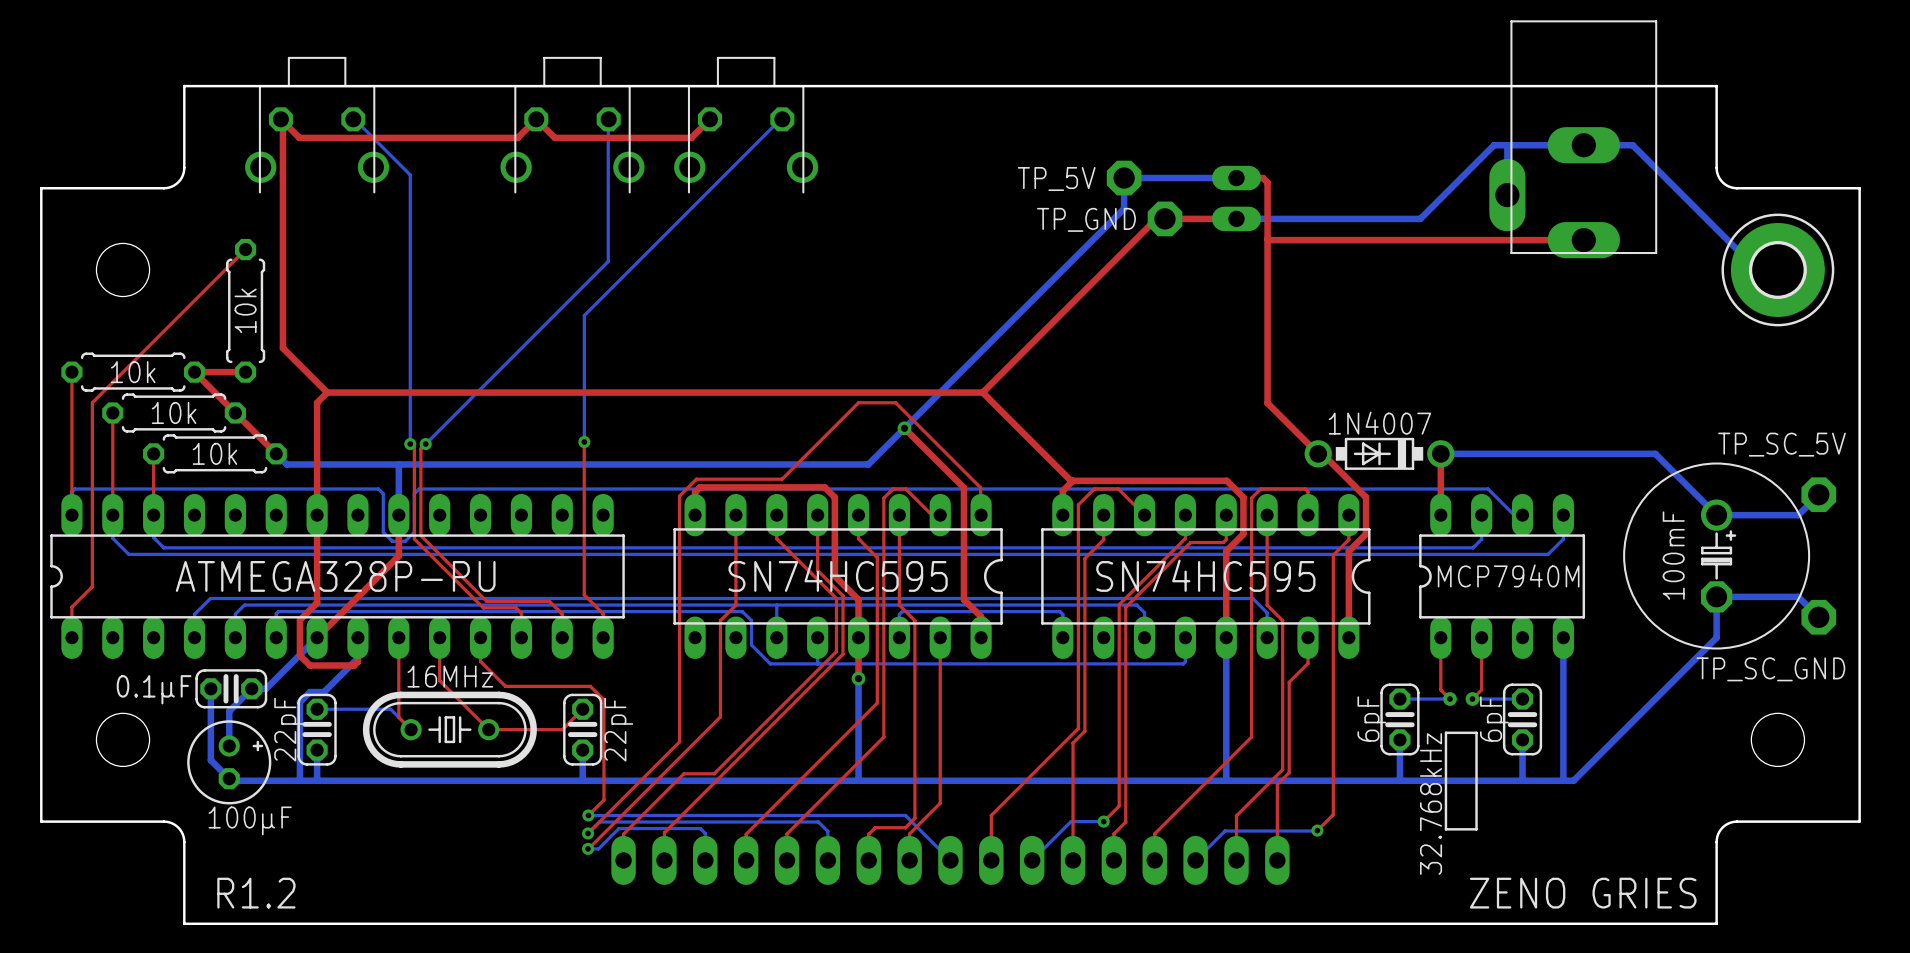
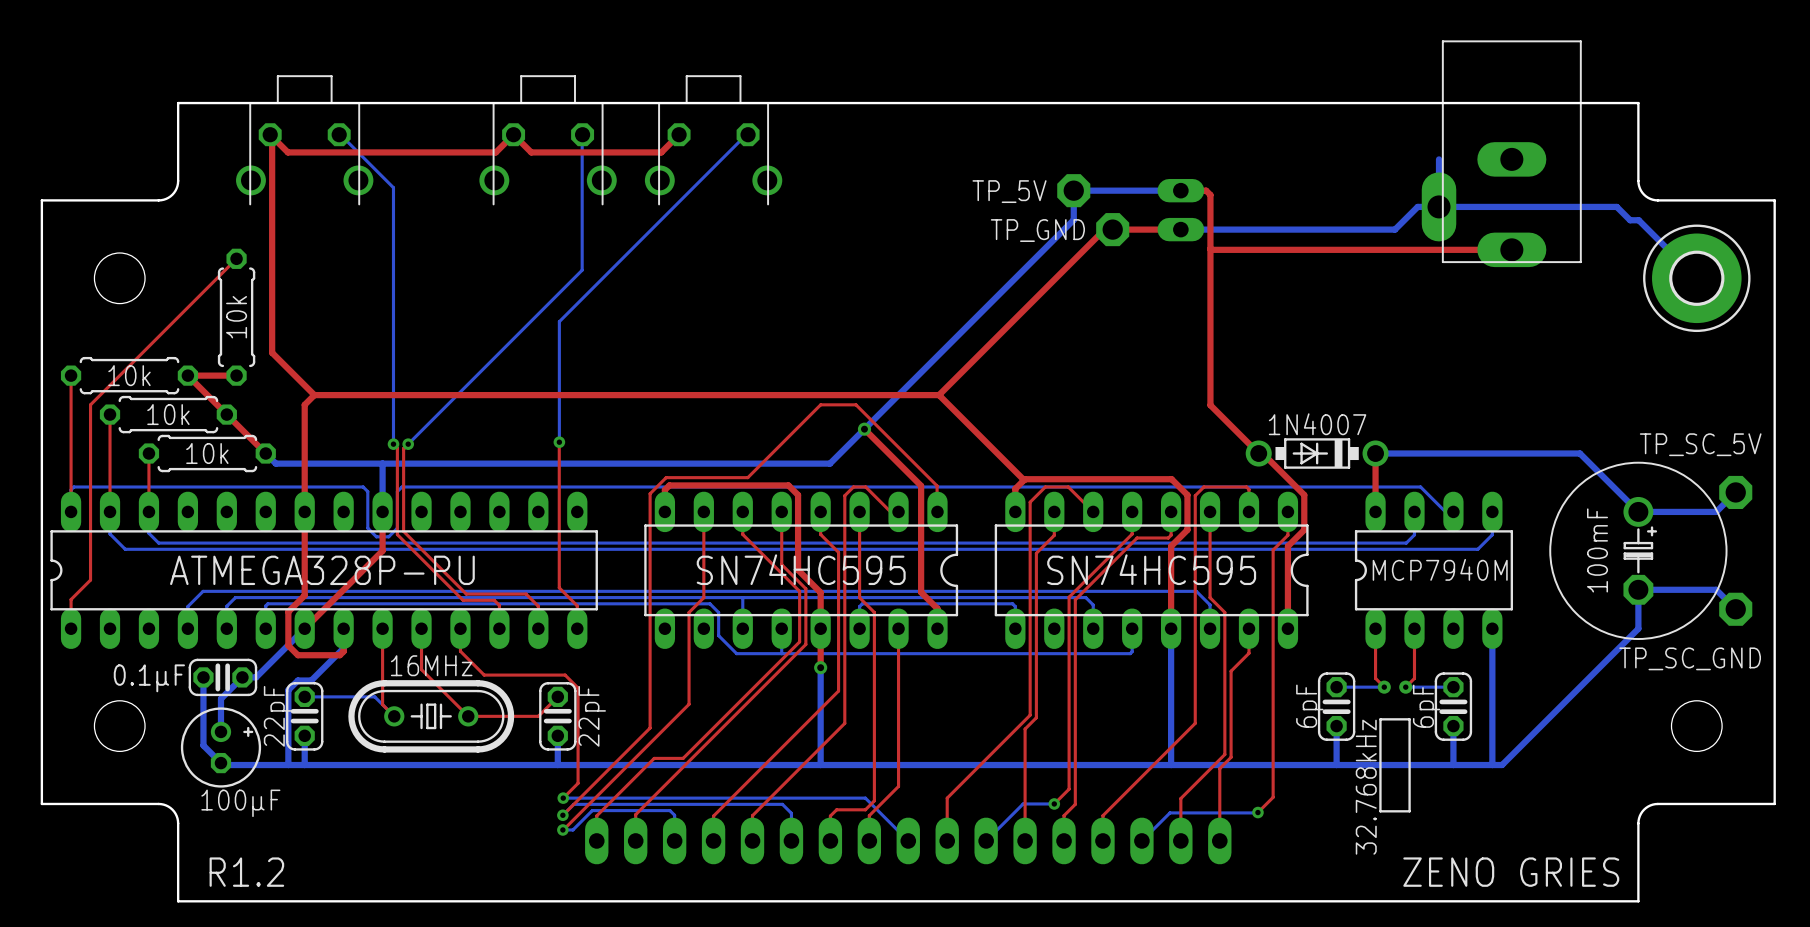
bottom track: (1420, 218) (1494, 145) (1632, 145) (1757, 269) (1777, 269) -> (1356, 229) (1395, 229) (1417, 206) (1616, 206) (1630, 220) (1638, 220) (1696, 278)

